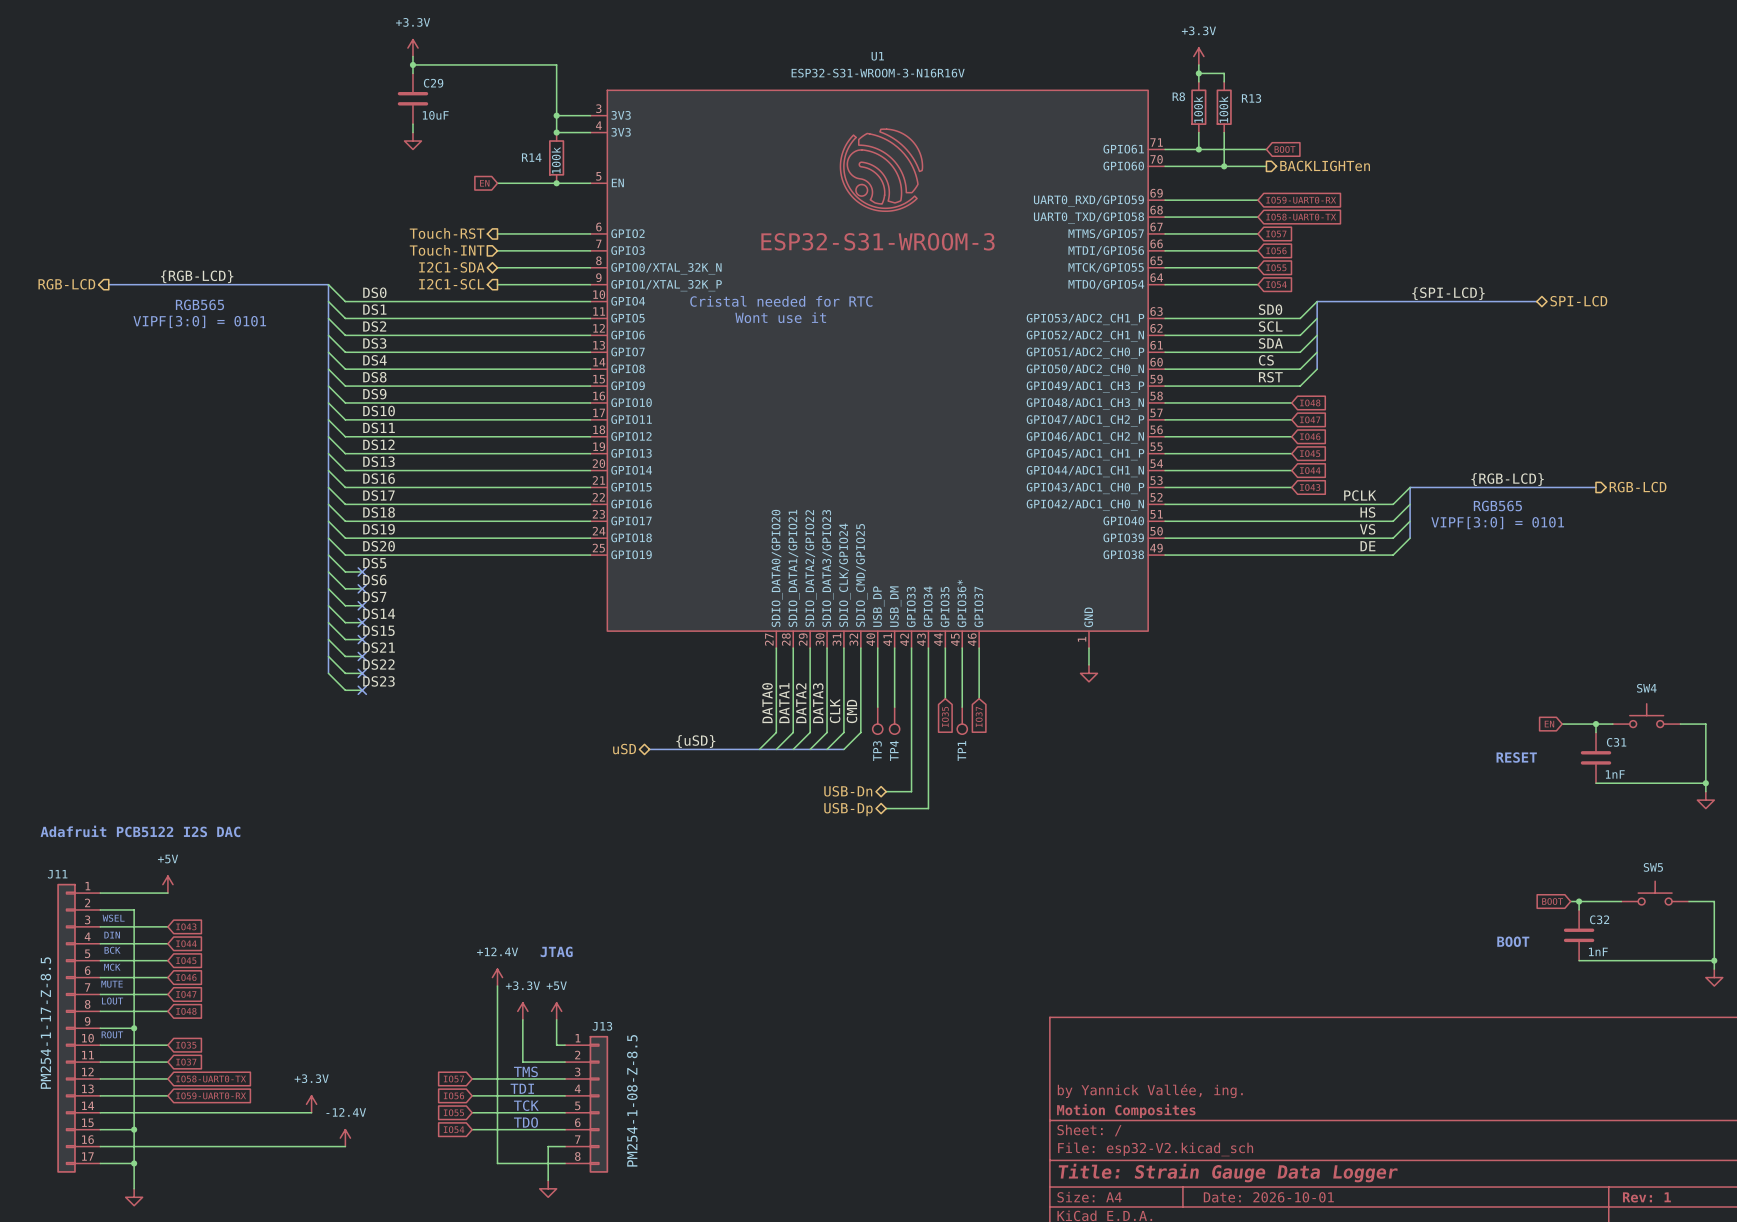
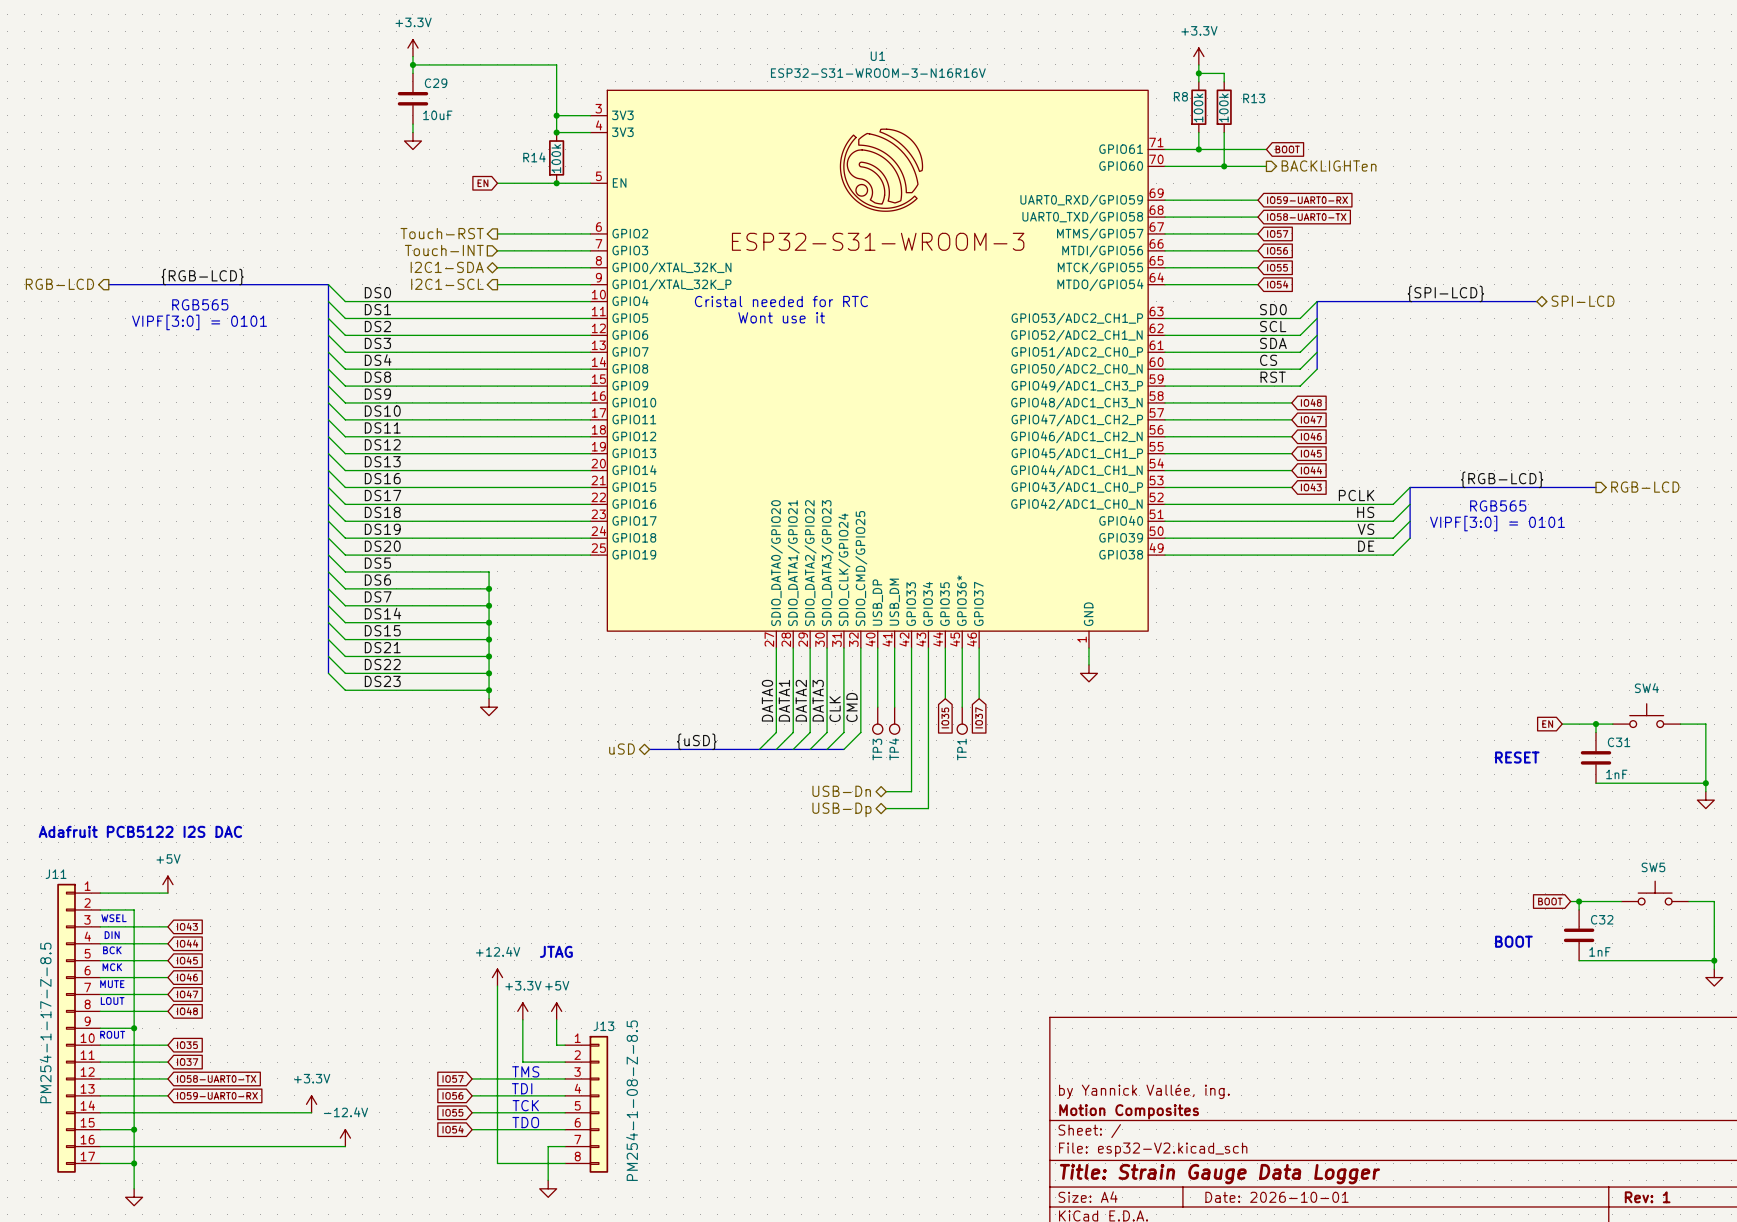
wire: none -> (362, 571) (489, 571) (489, 698)
no-connect mark: (362, 571) -> none
wire: none -> (362, 588) (489, 588)
no-connect mark: (362, 588) -> none
junction: none -> (489, 588)
wire: none -> (362, 605) (489, 605)
no-connect mark: (362, 605) -> none
junction: none -> (489, 605)
wire: none -> (362, 622) (489, 622)
no-connect mark: (362, 622) -> none
junction: none -> (489, 622)
wire: none -> (362, 639) (489, 639)
no-connect mark: (362, 639) -> none
junction: none -> (489, 639)
wire: none -> (362, 656) (489, 656)
no-connect mark: (362, 656) -> none
junction: none -> (489, 656)
wire: none -> (362, 673) (489, 673)
no-connect mark: (362, 673) -> none
junction: none -> (489, 673)
wire: none -> (362, 690) (489, 690)
no-connect mark: (362, 690) -> none
junction: none -> (489, 690)
power symbol: none -> (489, 707)

